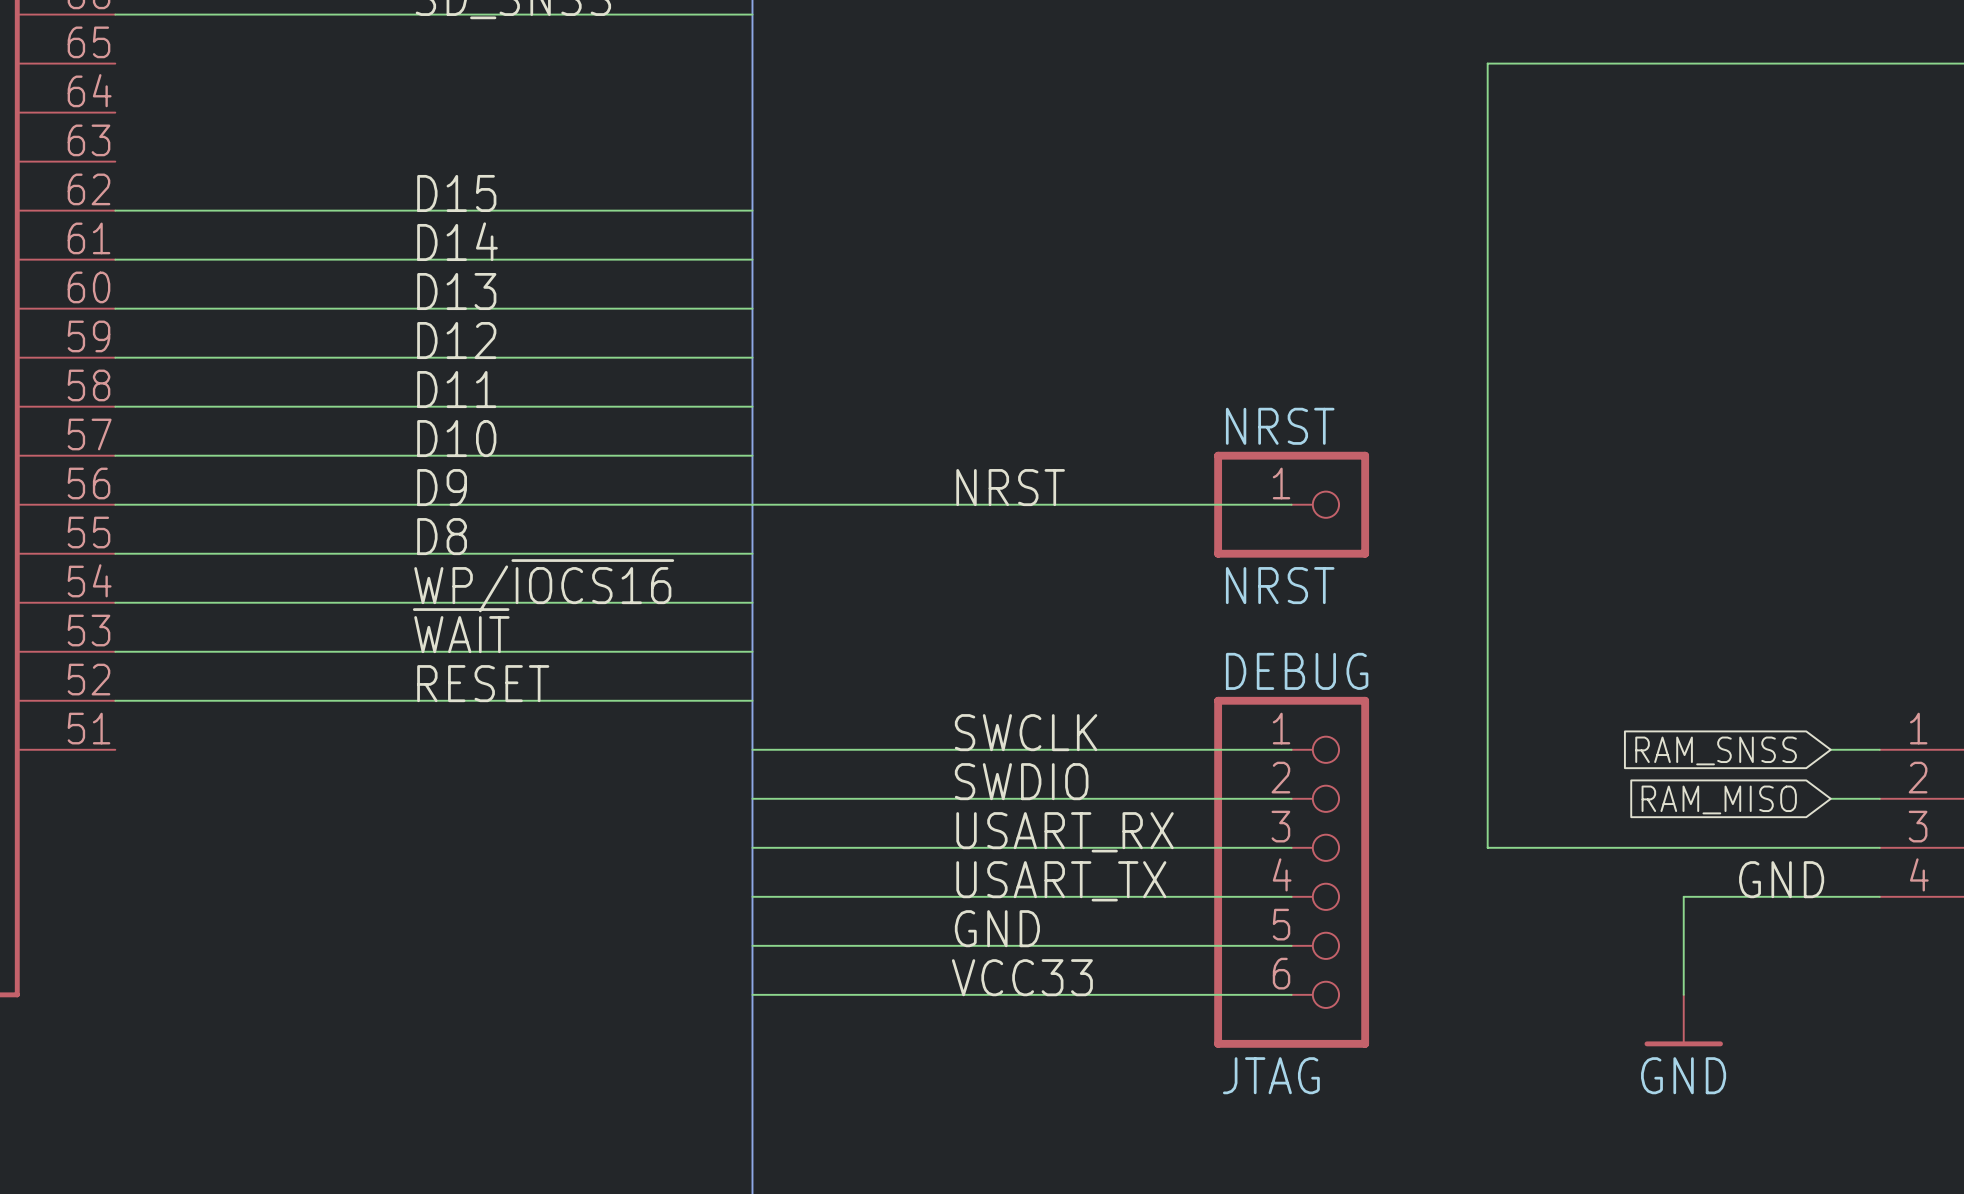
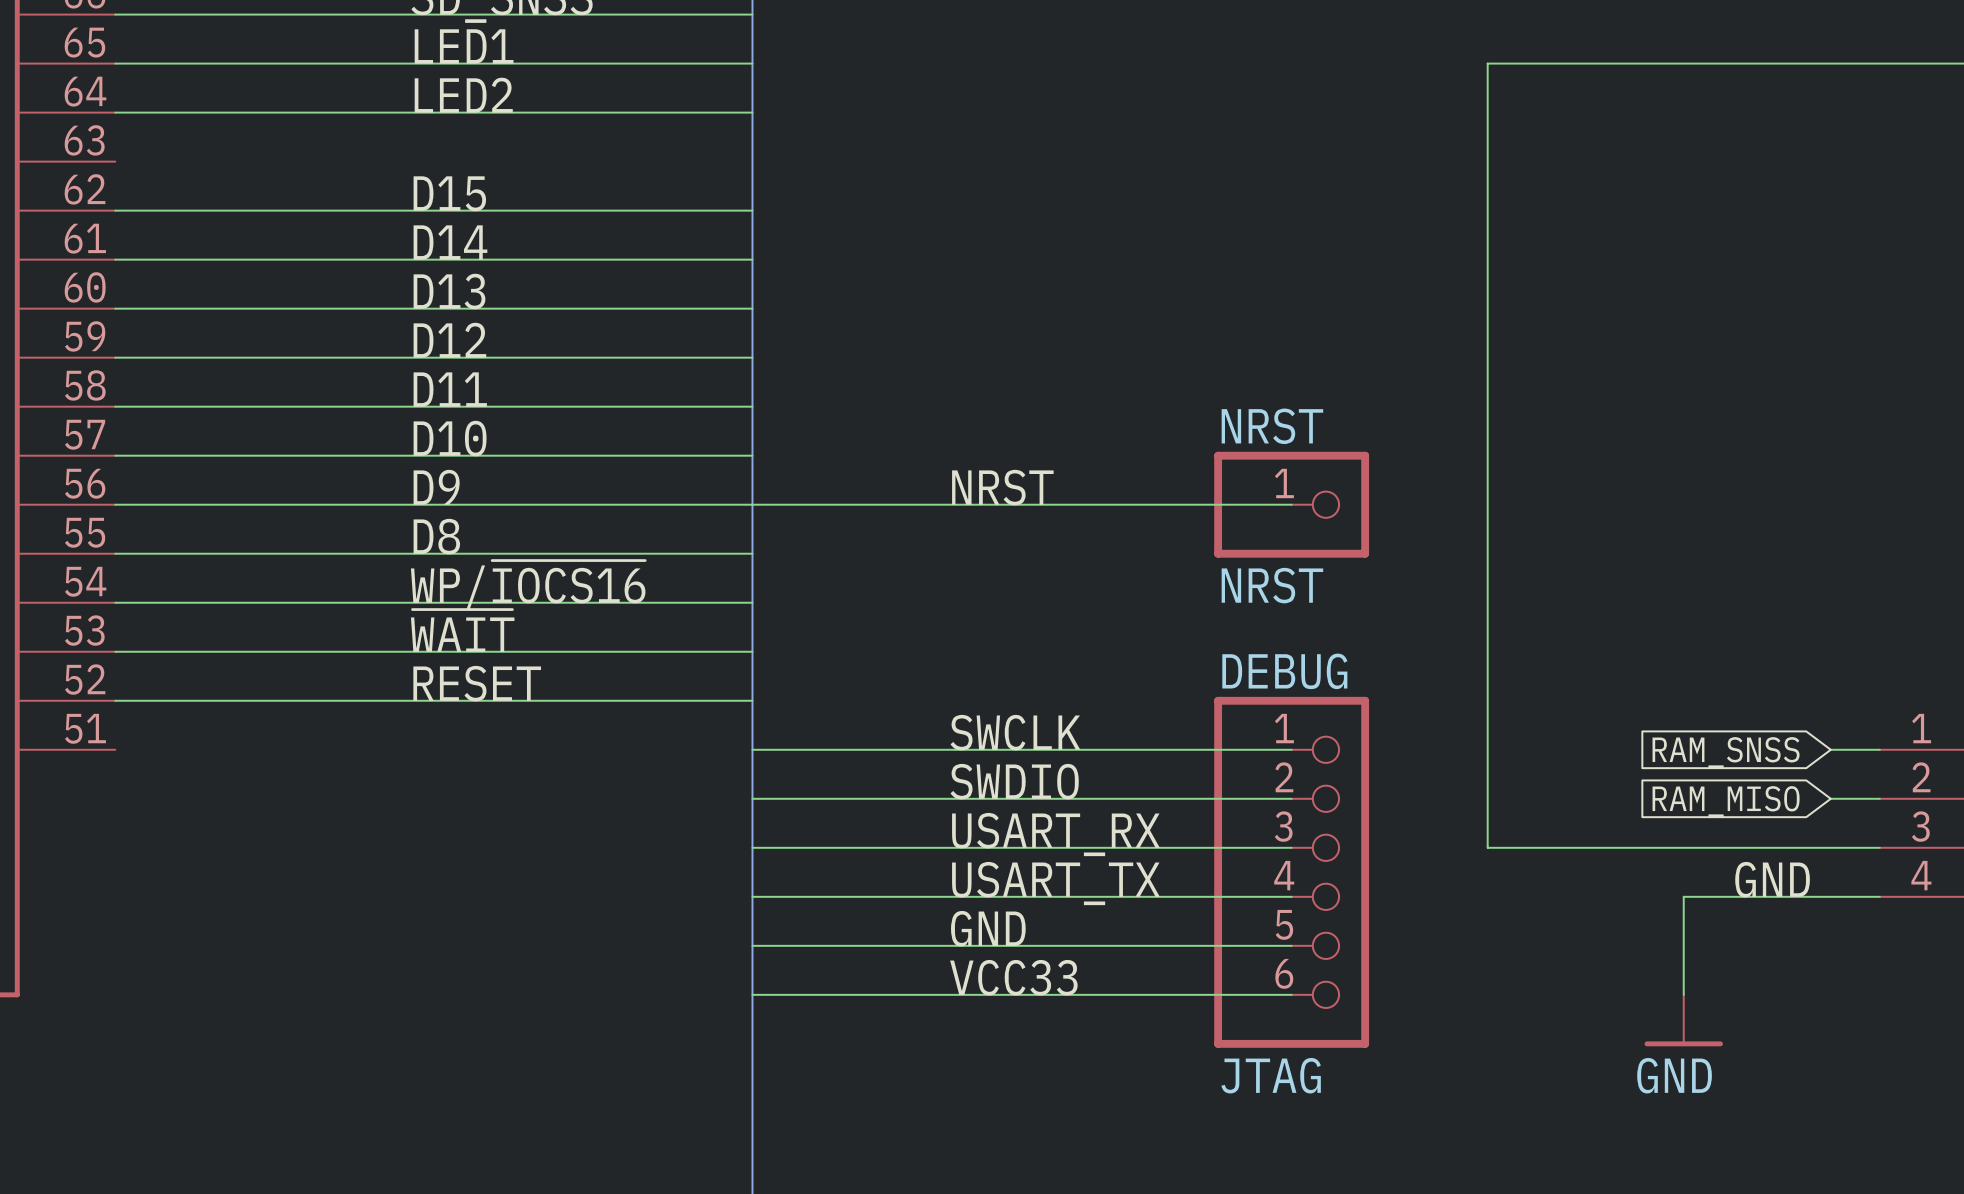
label: none -> LED1 (464, 46)
wire: none -> (115, 63) (752, 63)
label: none -> LED2 (463, 95)
wire: none -> (115, 112) (752, 112)

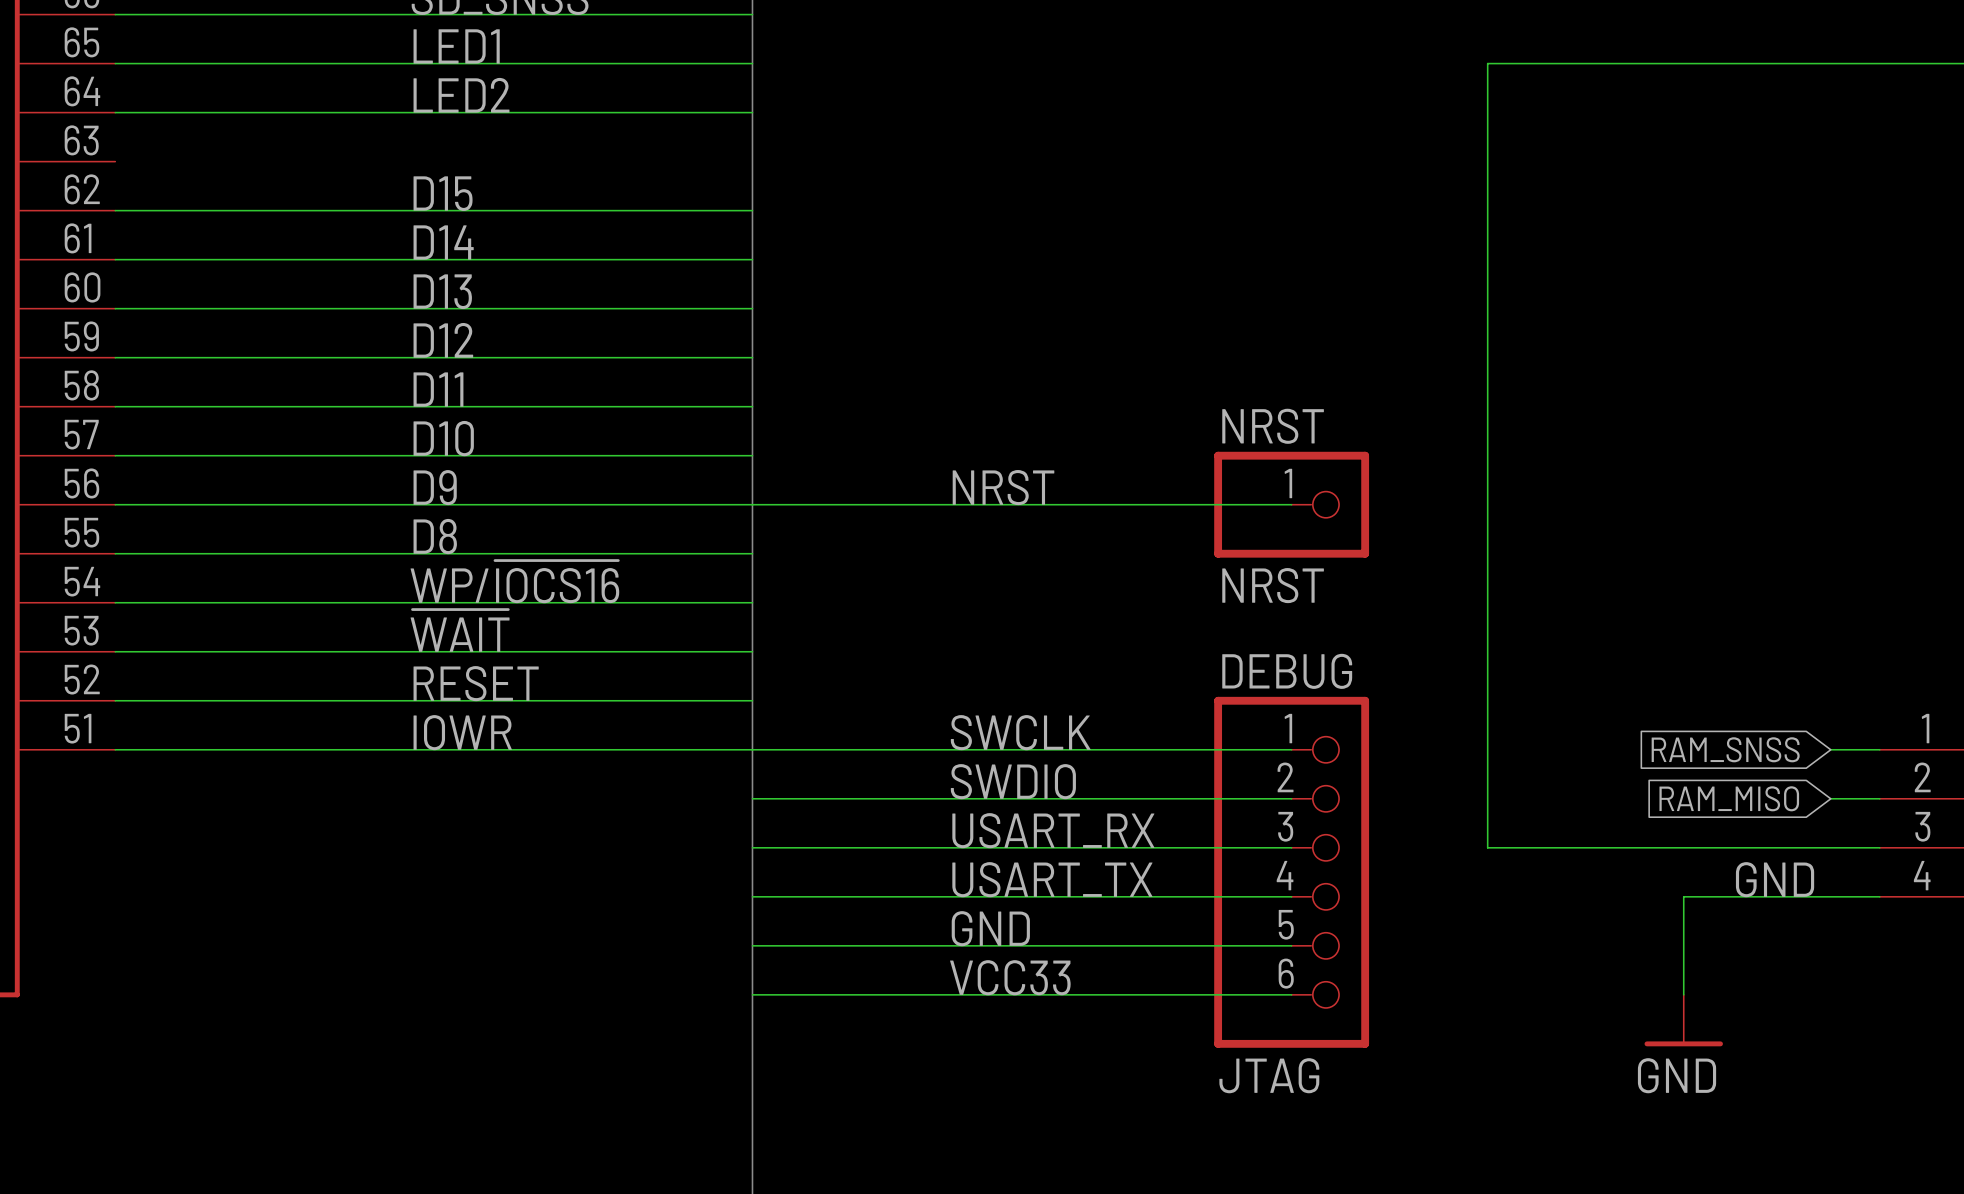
label: none -> IOWR (462, 732)
wire: none -> (115, 749) (752, 749)

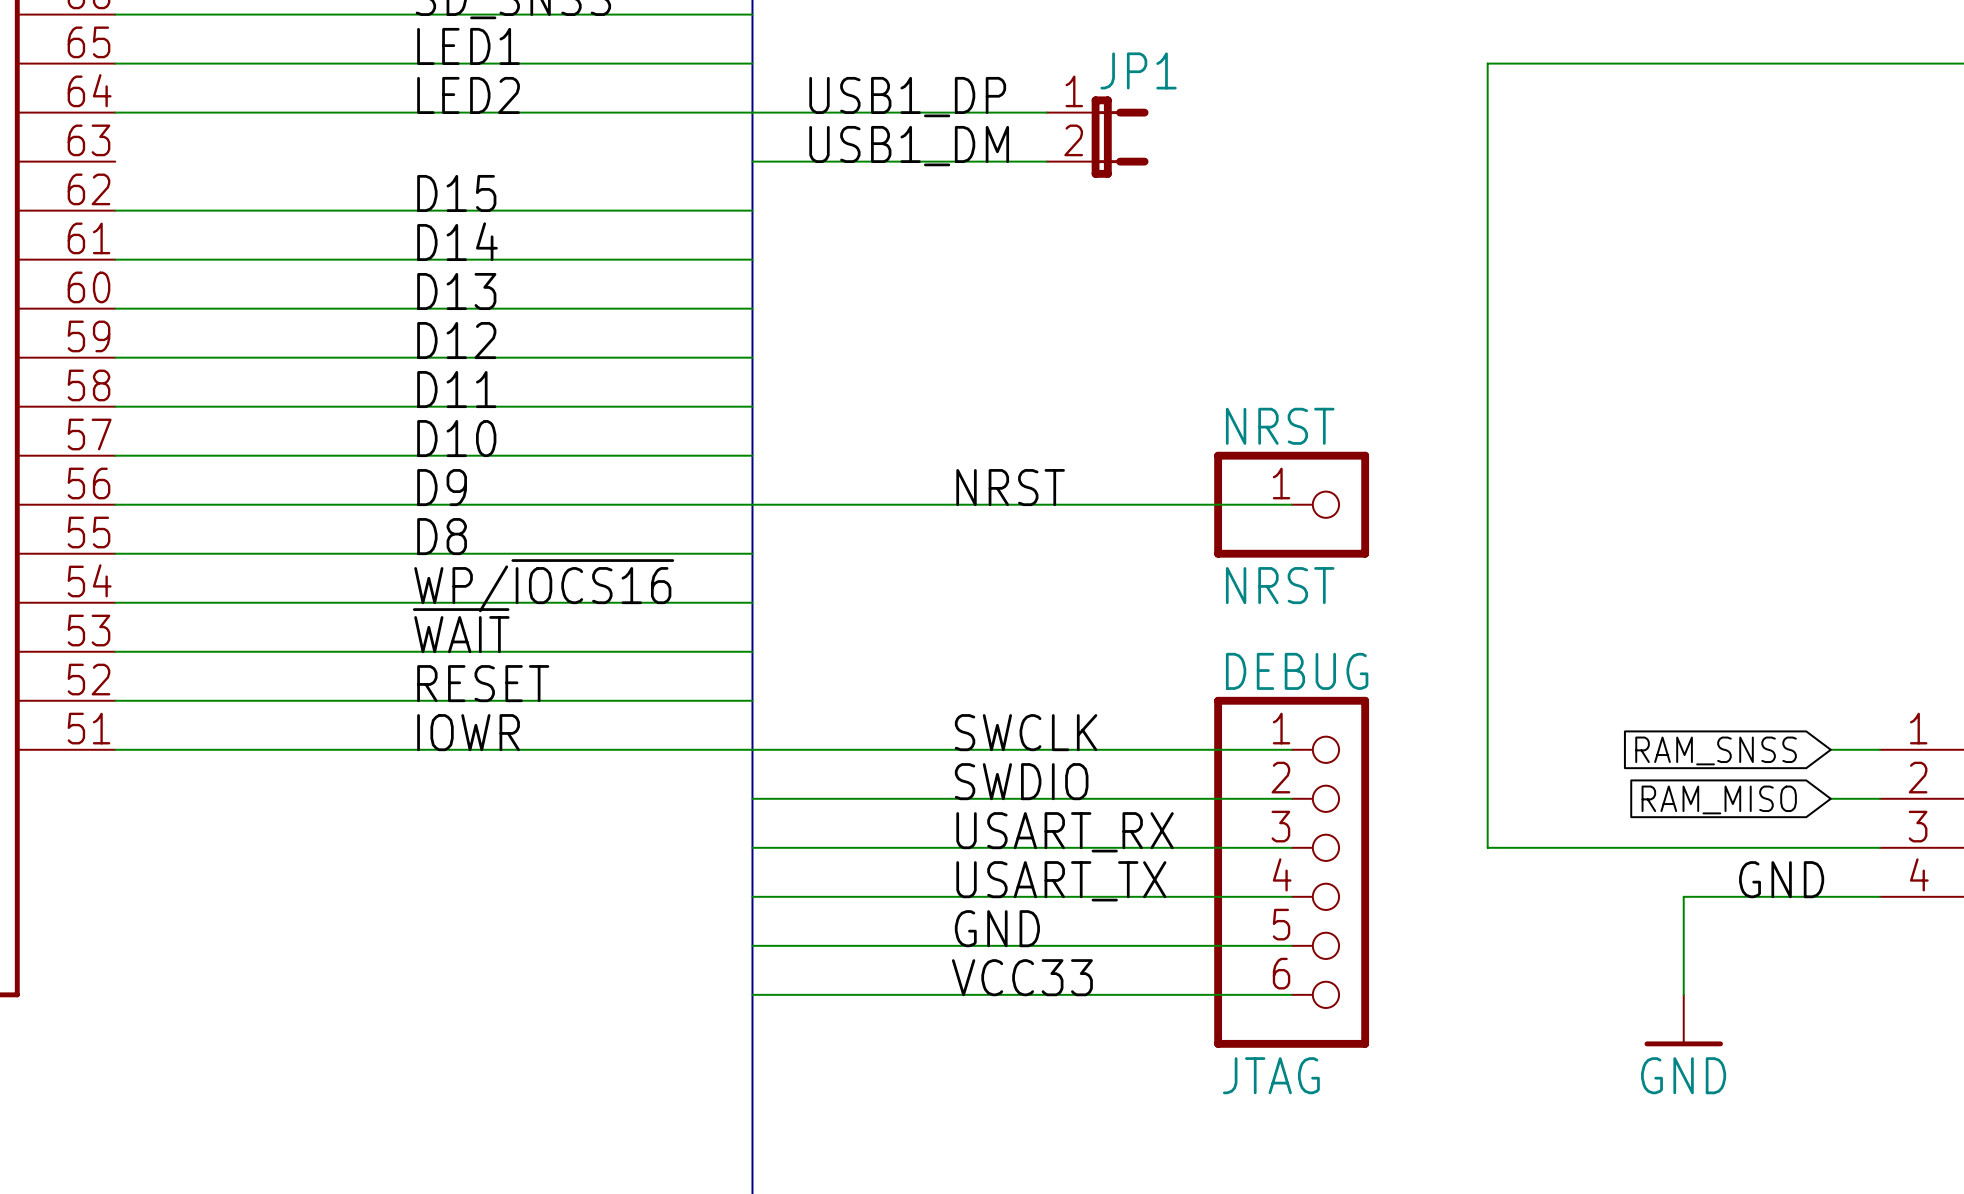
label: none -> USB1_DP (907, 97)
wire: none -> (752, 112) (1046, 112)
JP1: none -> (1097, 137)
label: none -> USB1_DM (909, 146)
wire: none -> (752, 161) (1046, 161)

